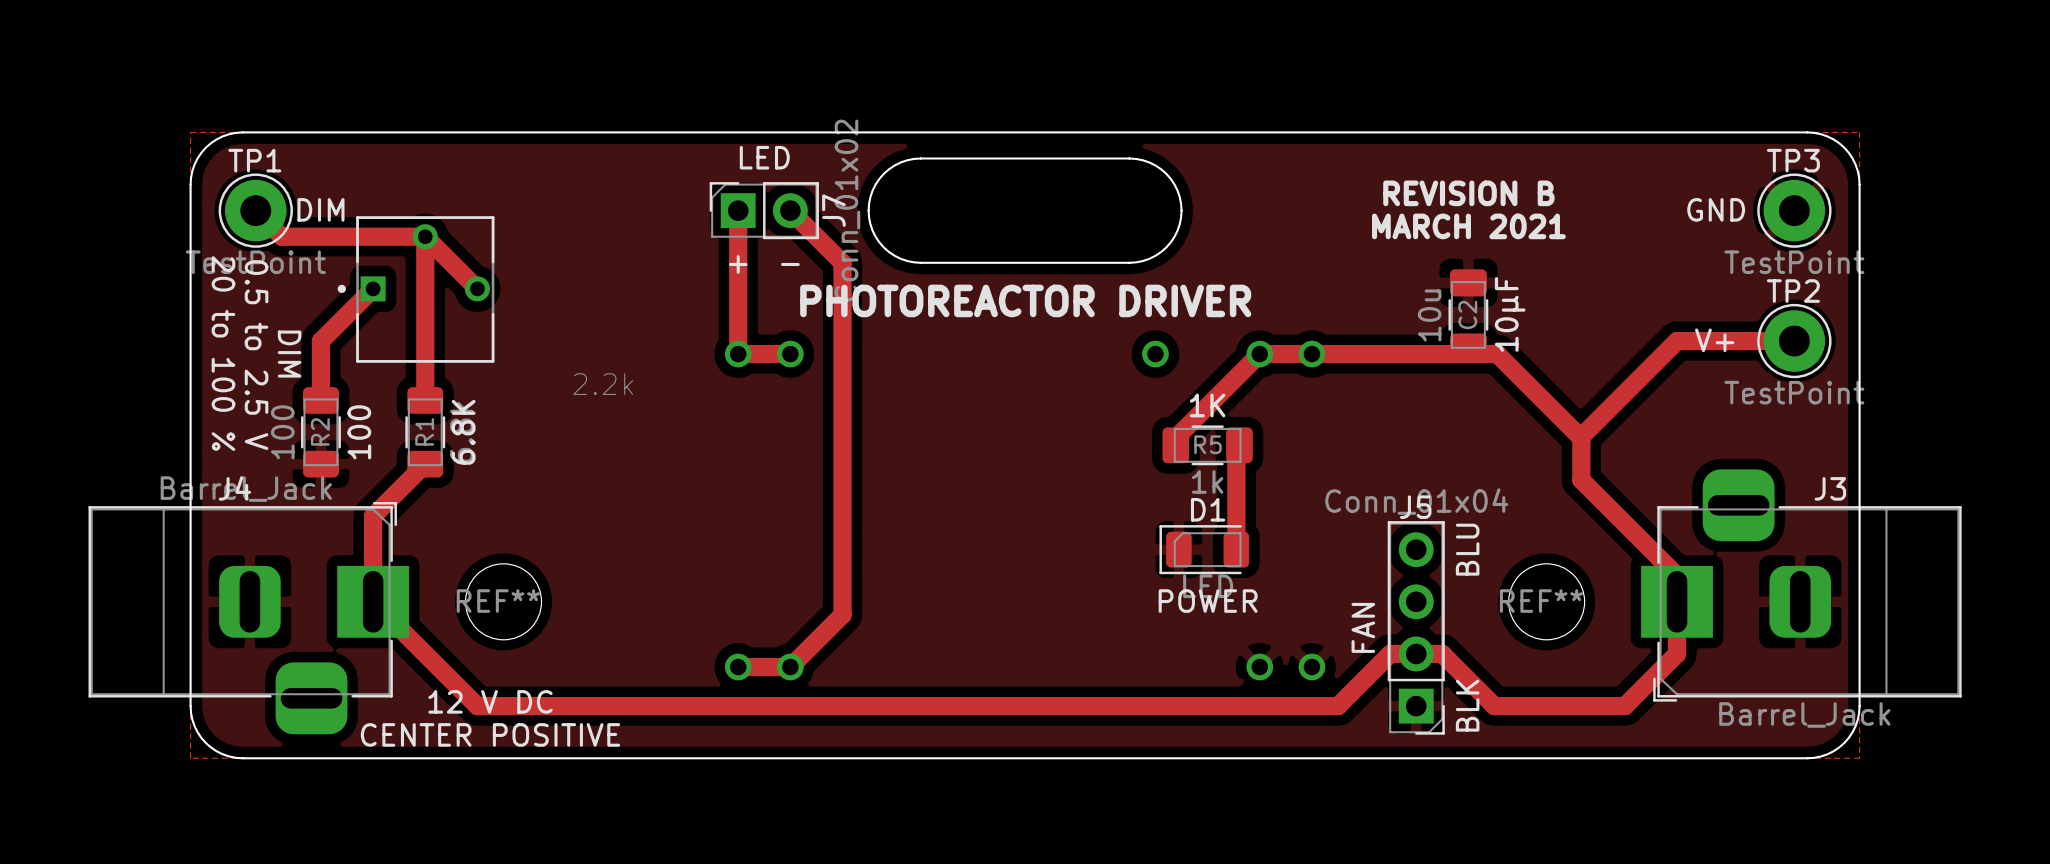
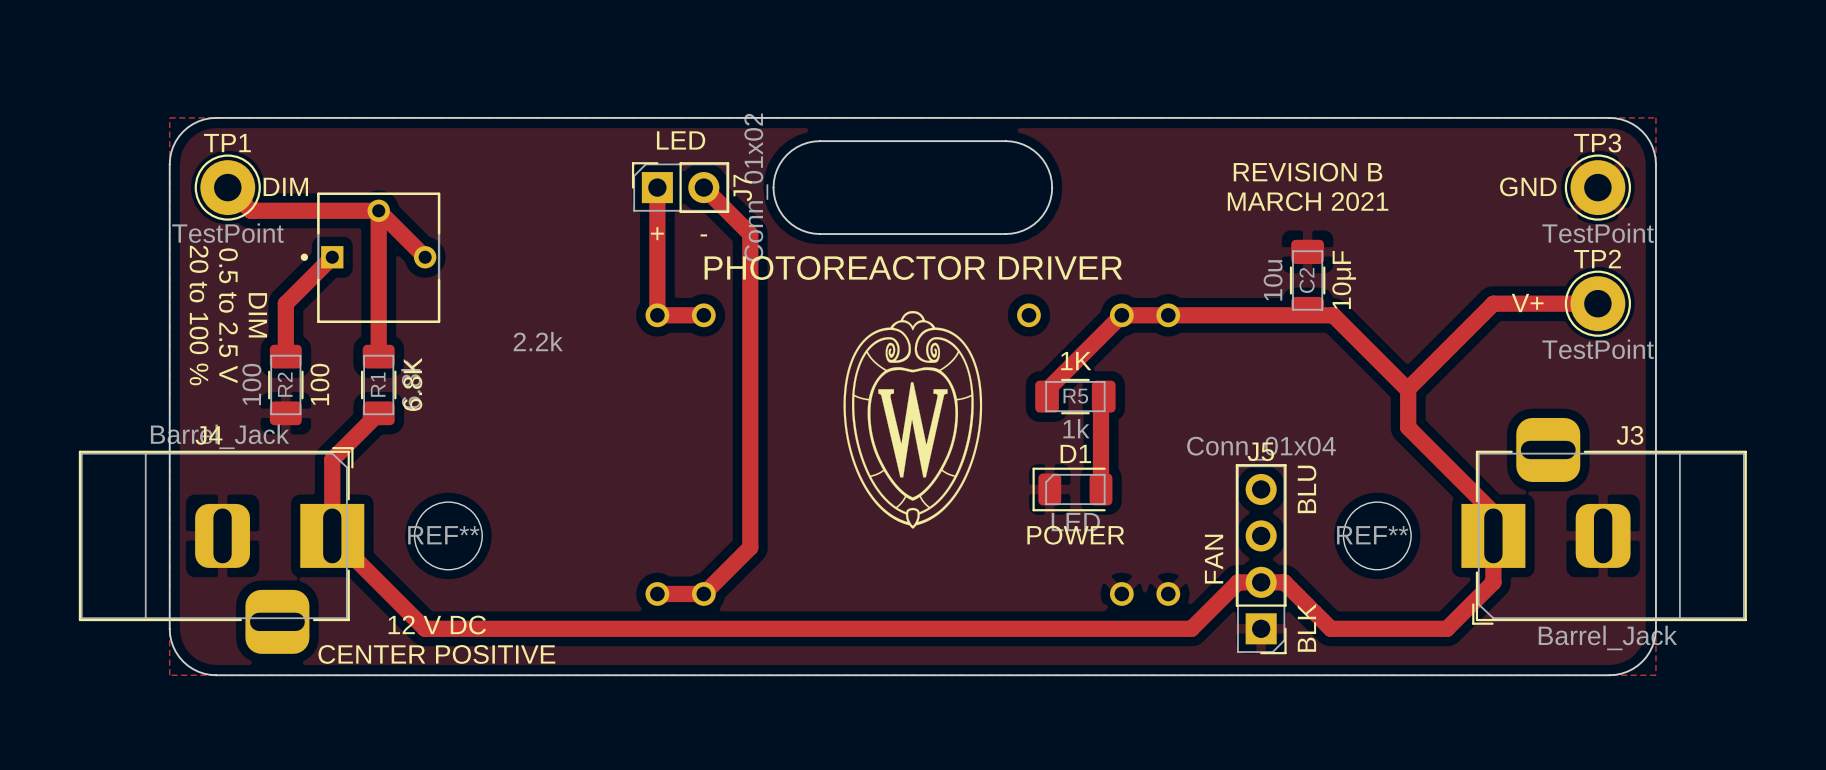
drawing: none -> [843, 310, 983, 529]

